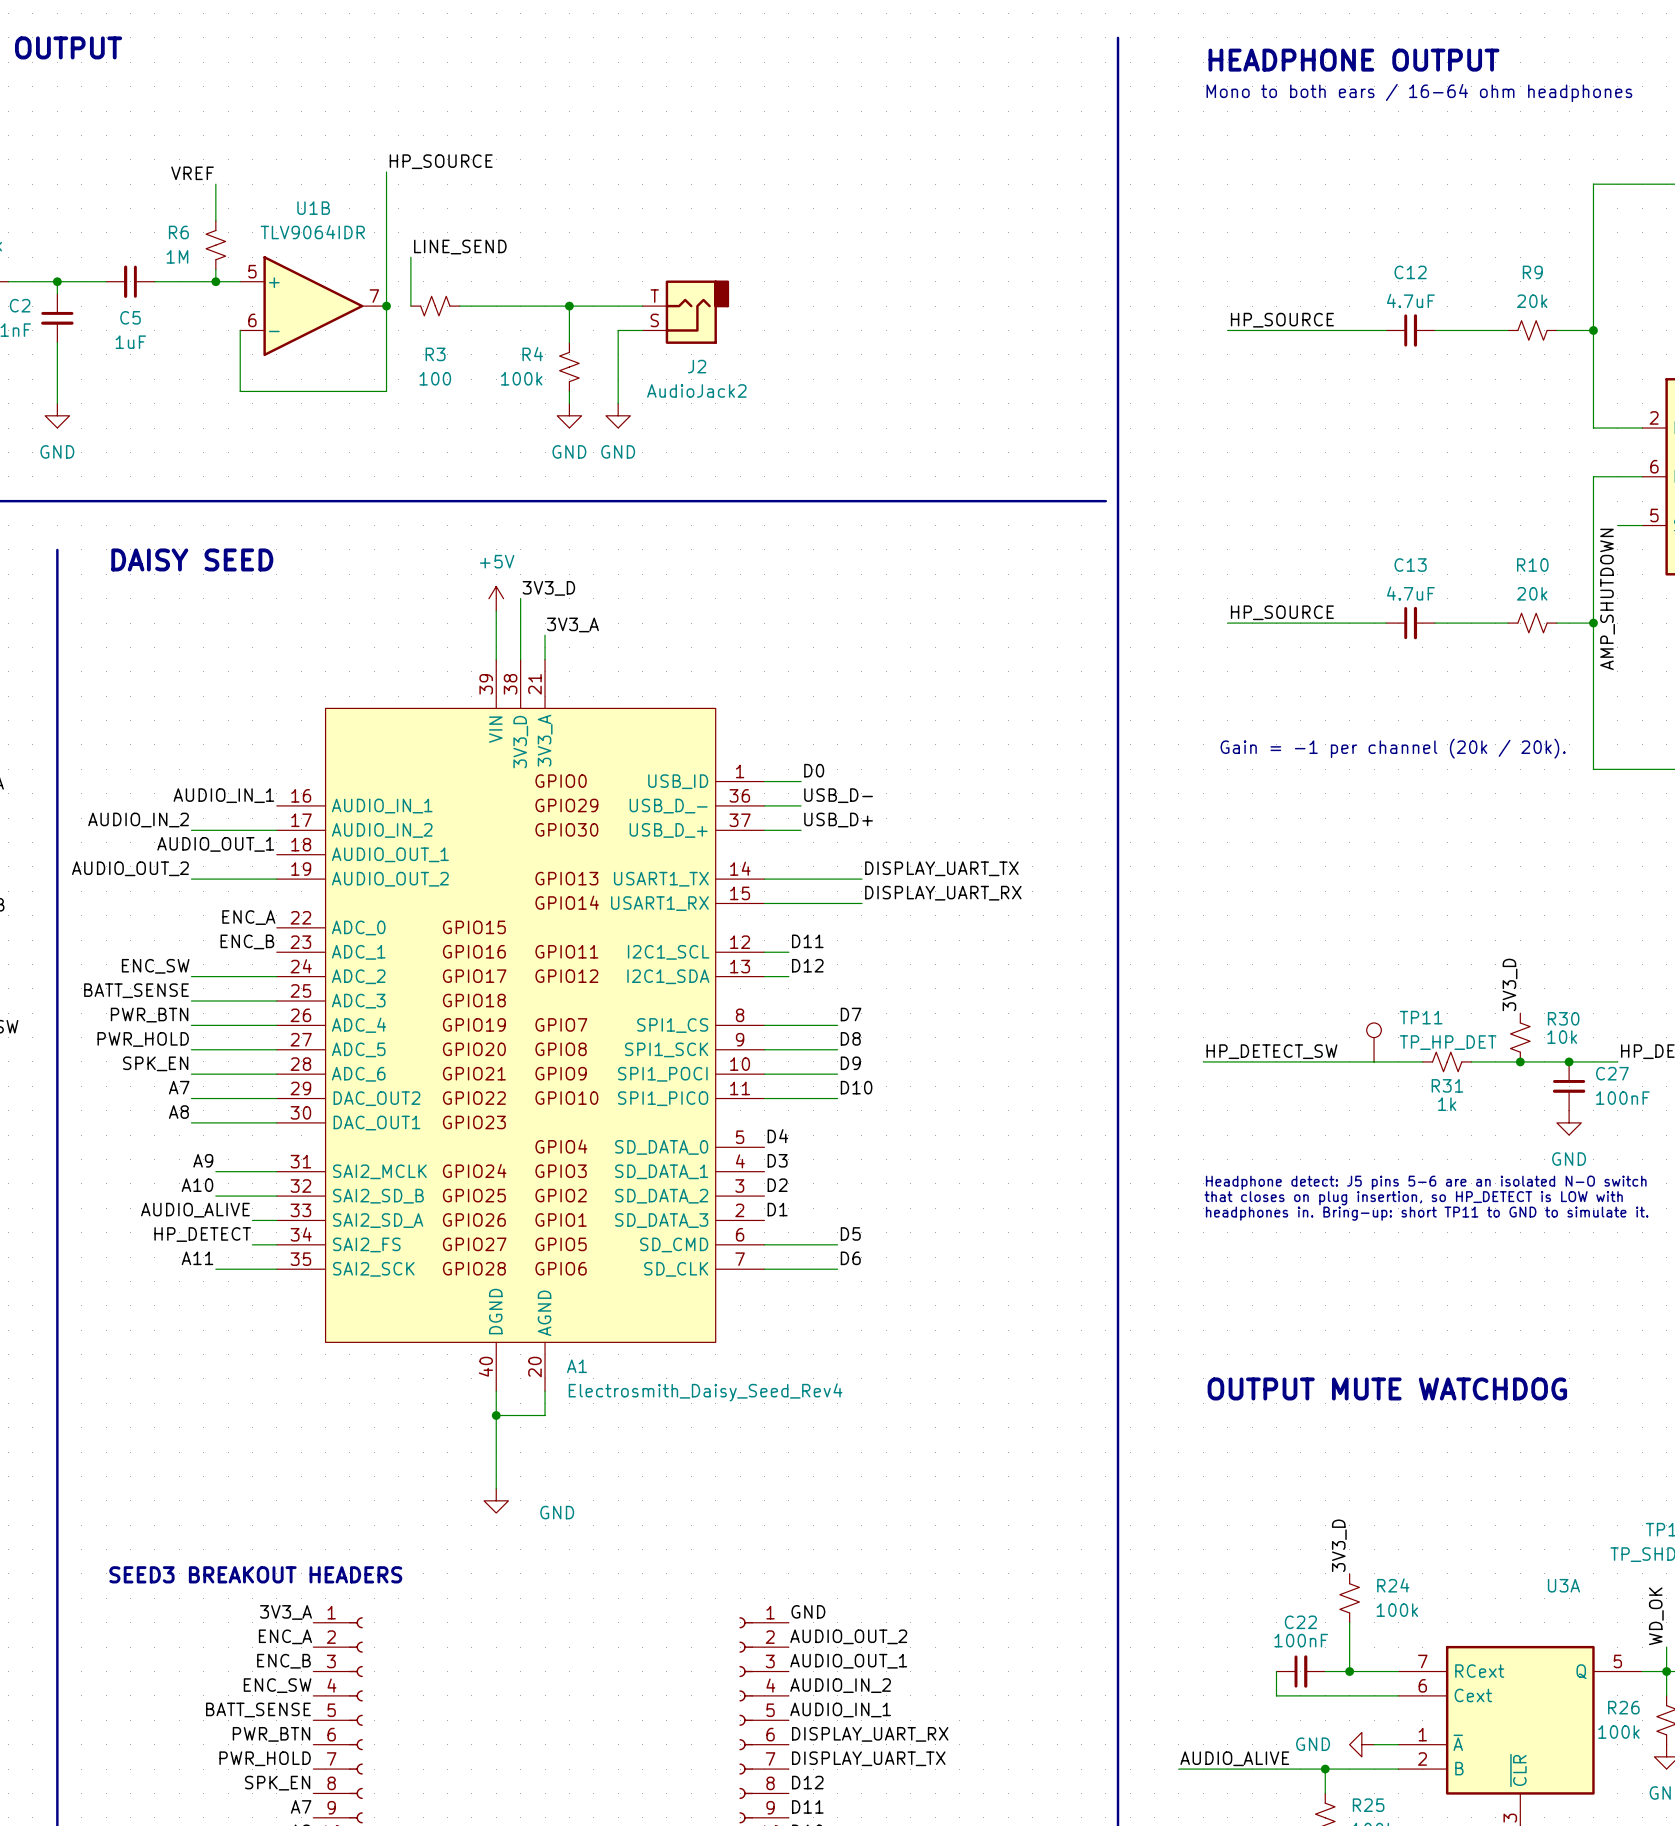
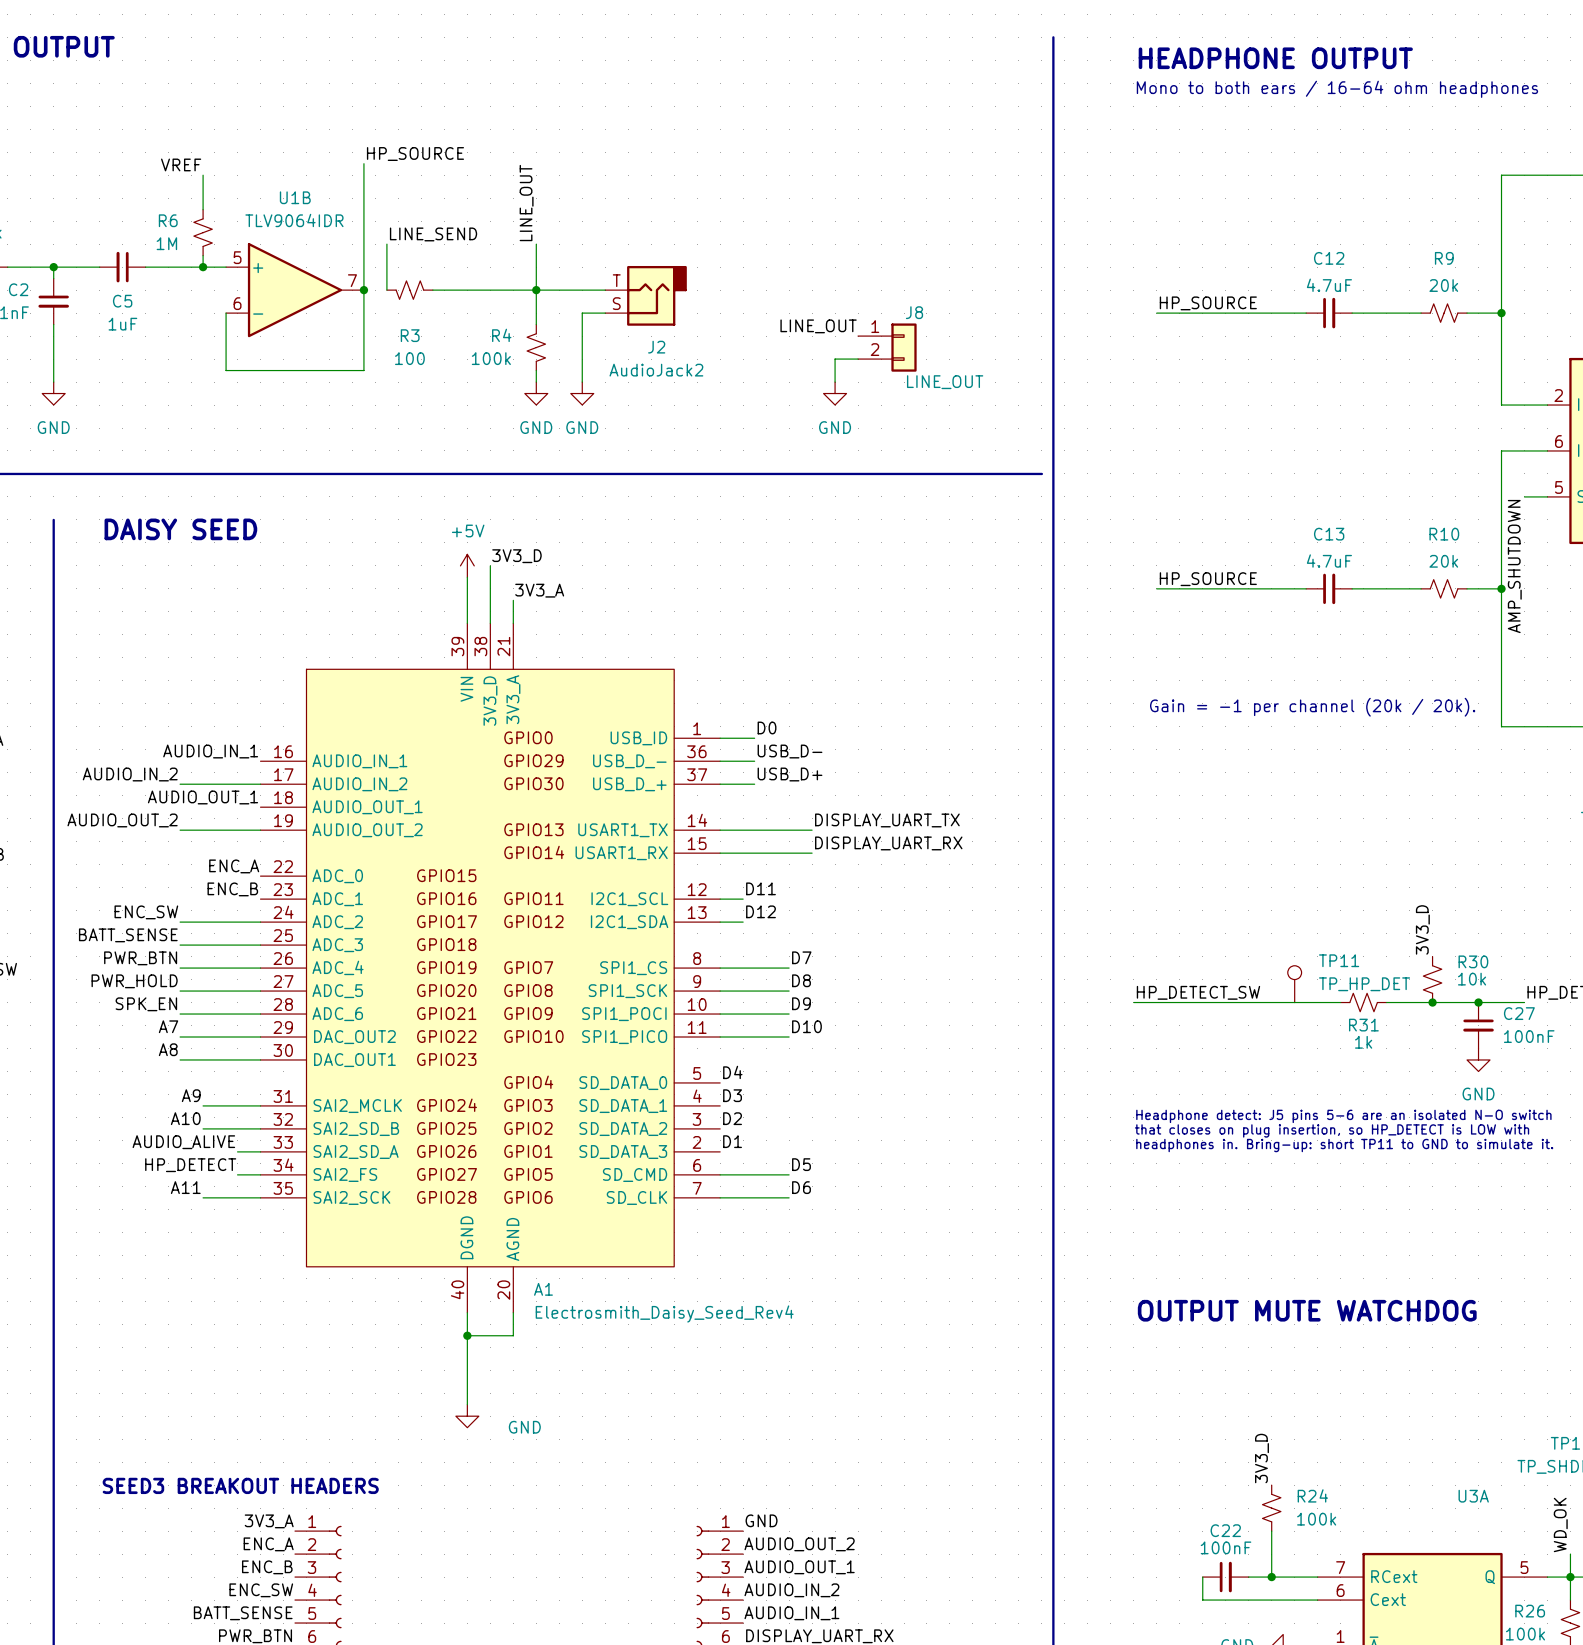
label: none -> LINE_OUT (526, 203)
wire: none -> (536, 244) (536, 290)
label: none -> LINE_OUT (818, 326)
J8: none -> LINE_OUT (887, 347)
wire: none -> (858, 359) (835, 359) (835, 382)
power symbol: none -> GND (835, 393)

